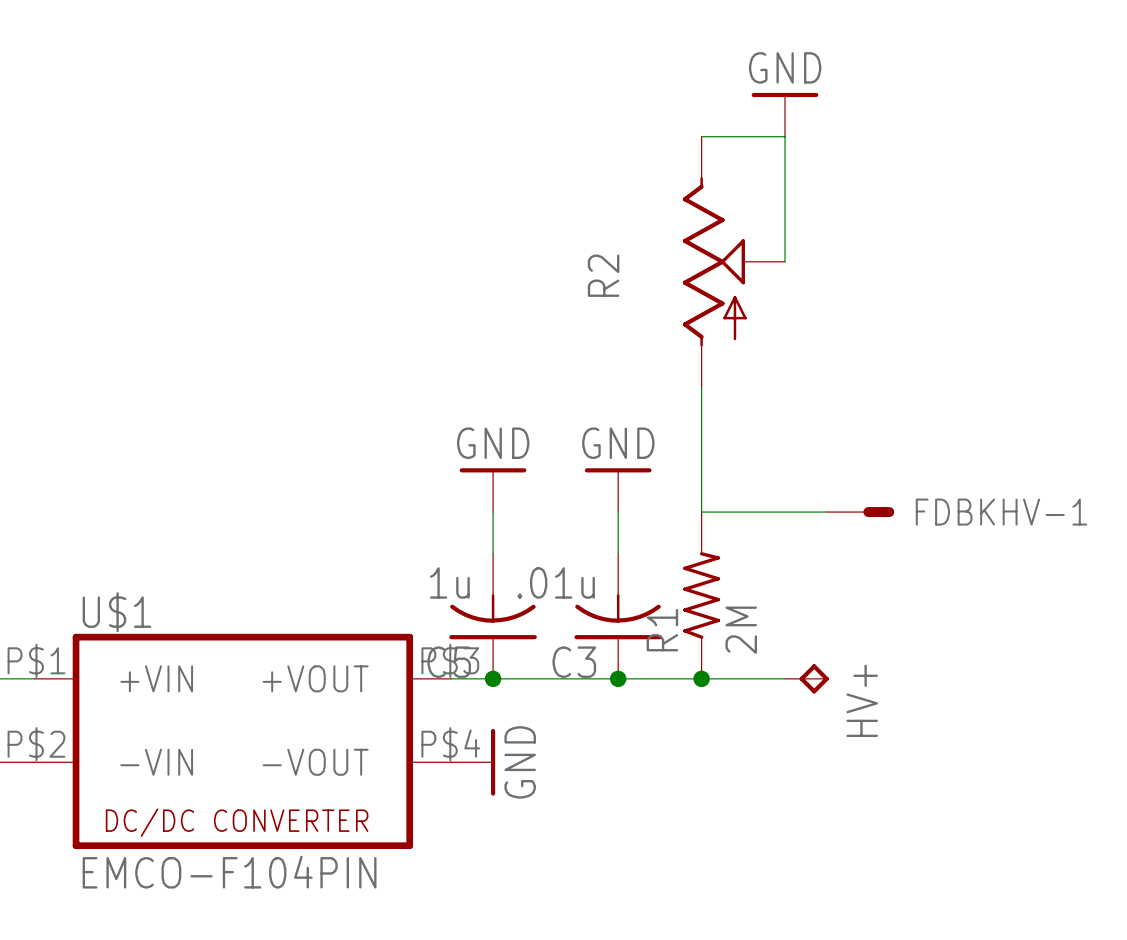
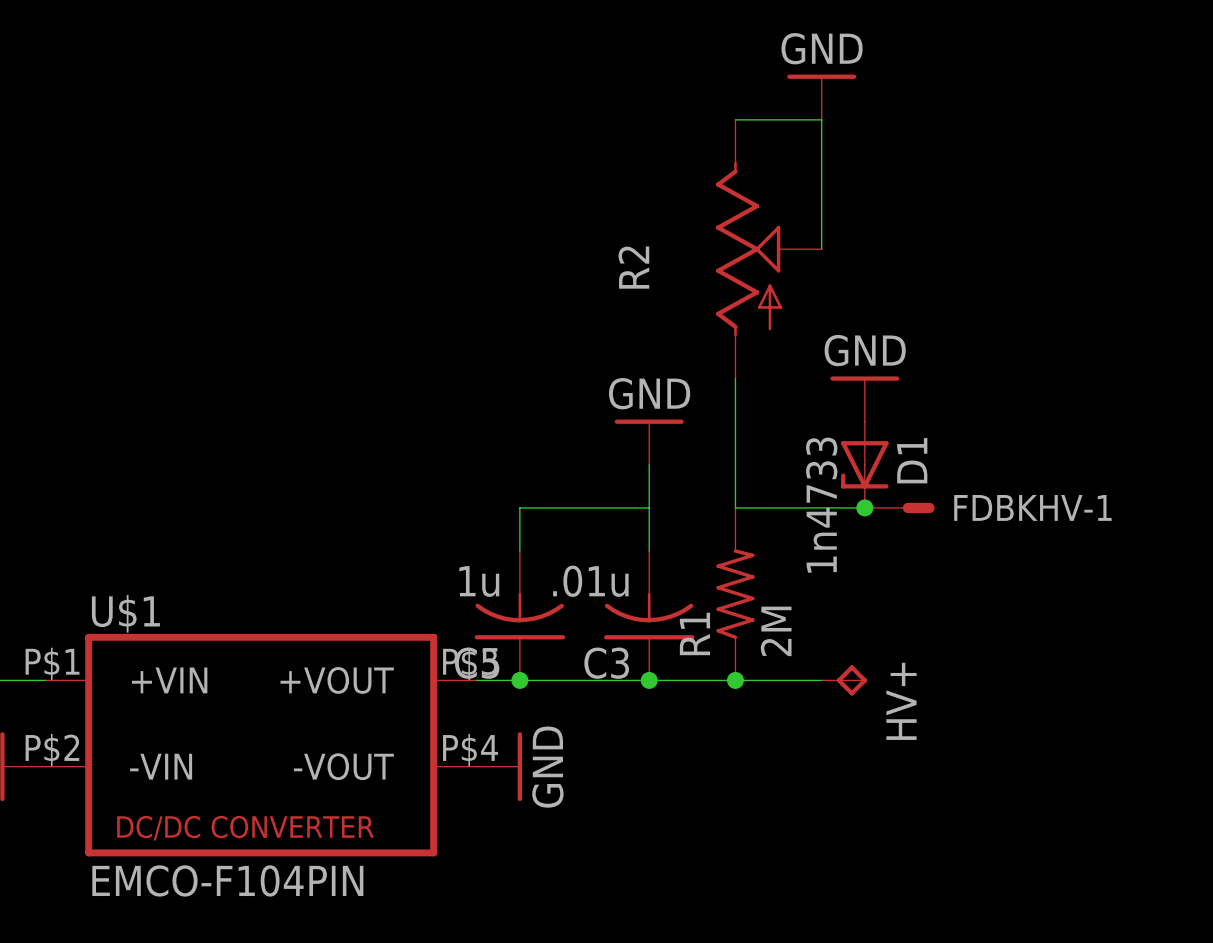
power symbol: none -> GND (864, 399)
wire: none -> (649, 464) (649, 507) (519, 507)
D1: none -> 1n4733 (864, 464)
power symbol: GND (493, 490) -> none
power symbol position: GND (618, 490) -> GND (649, 442)
junction: none -> (864, 507)

